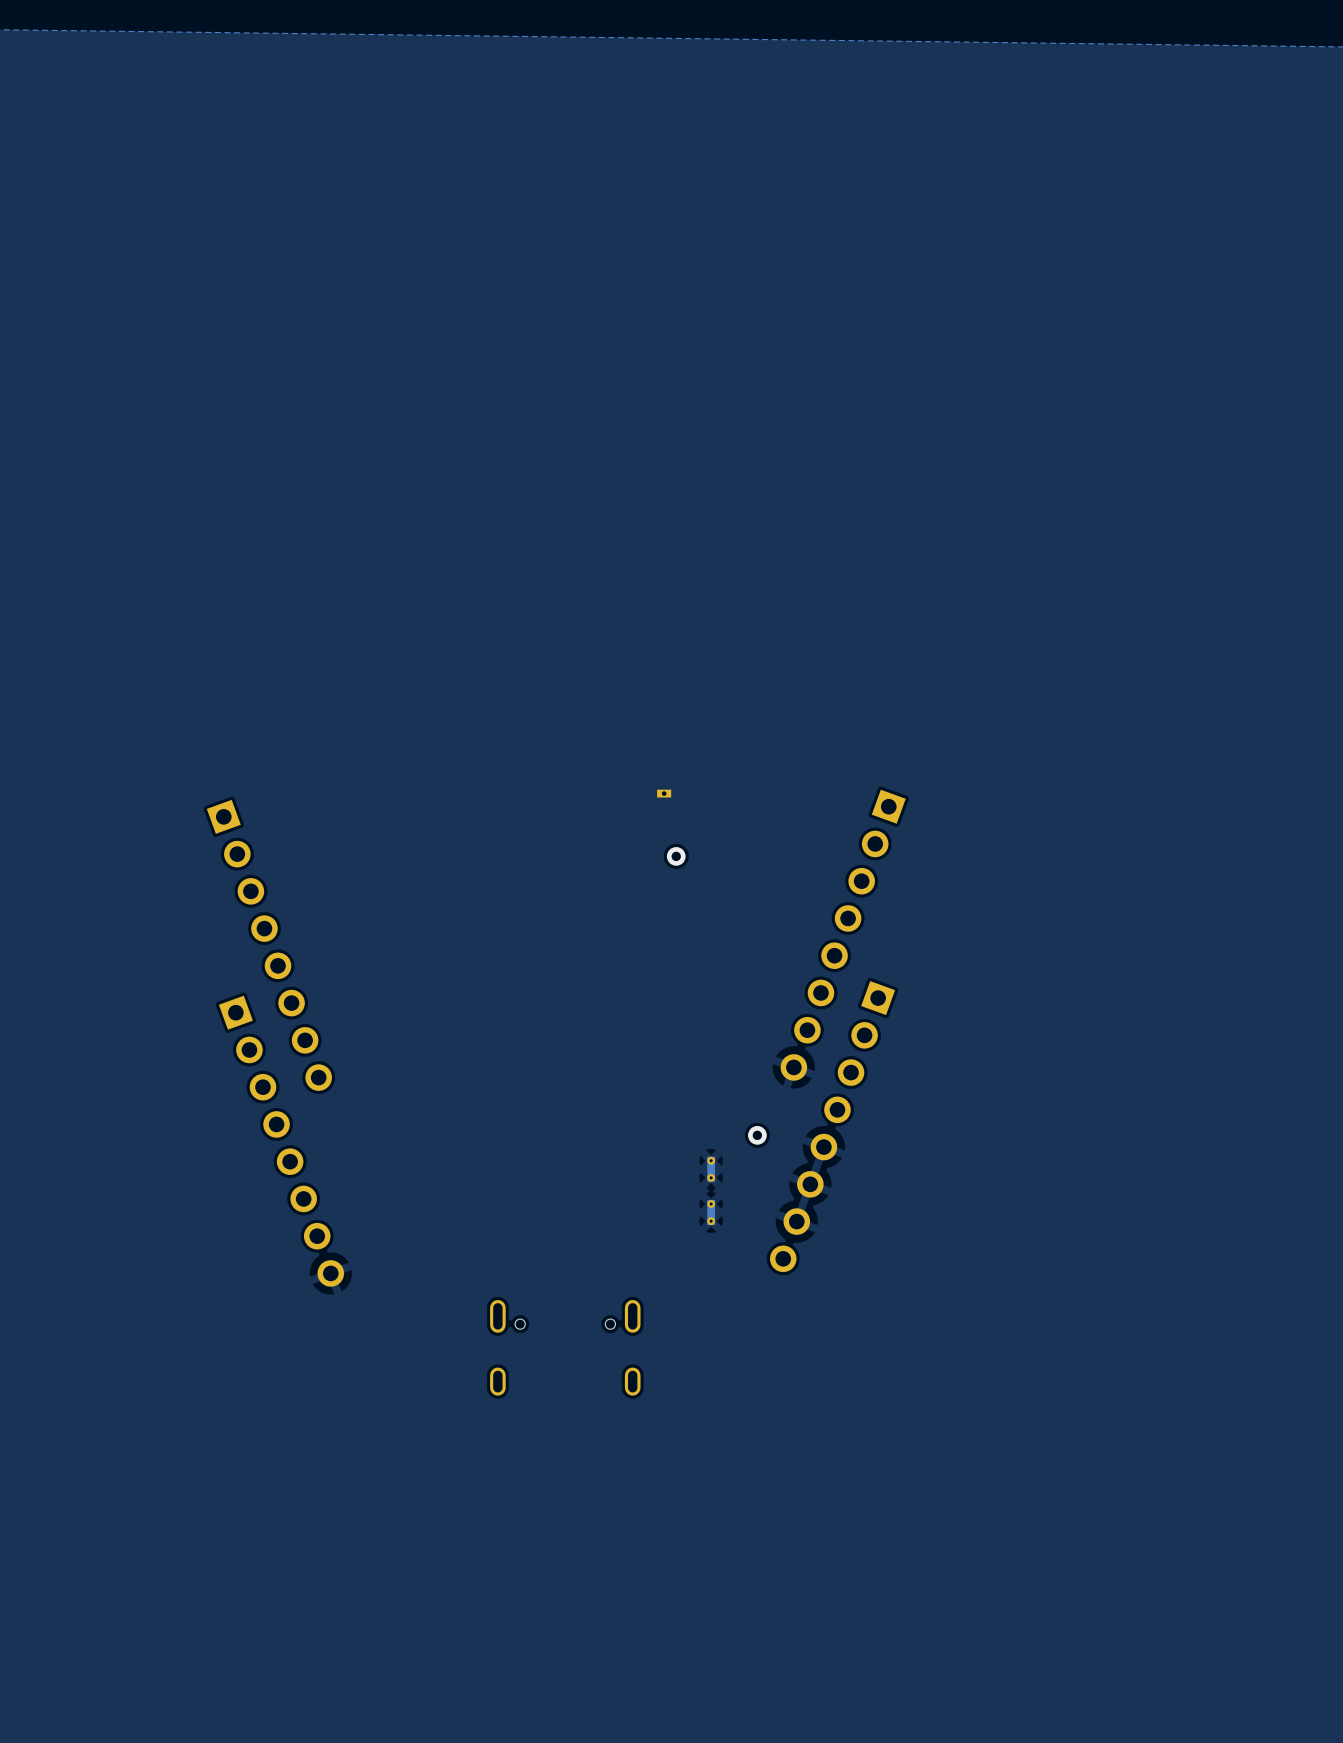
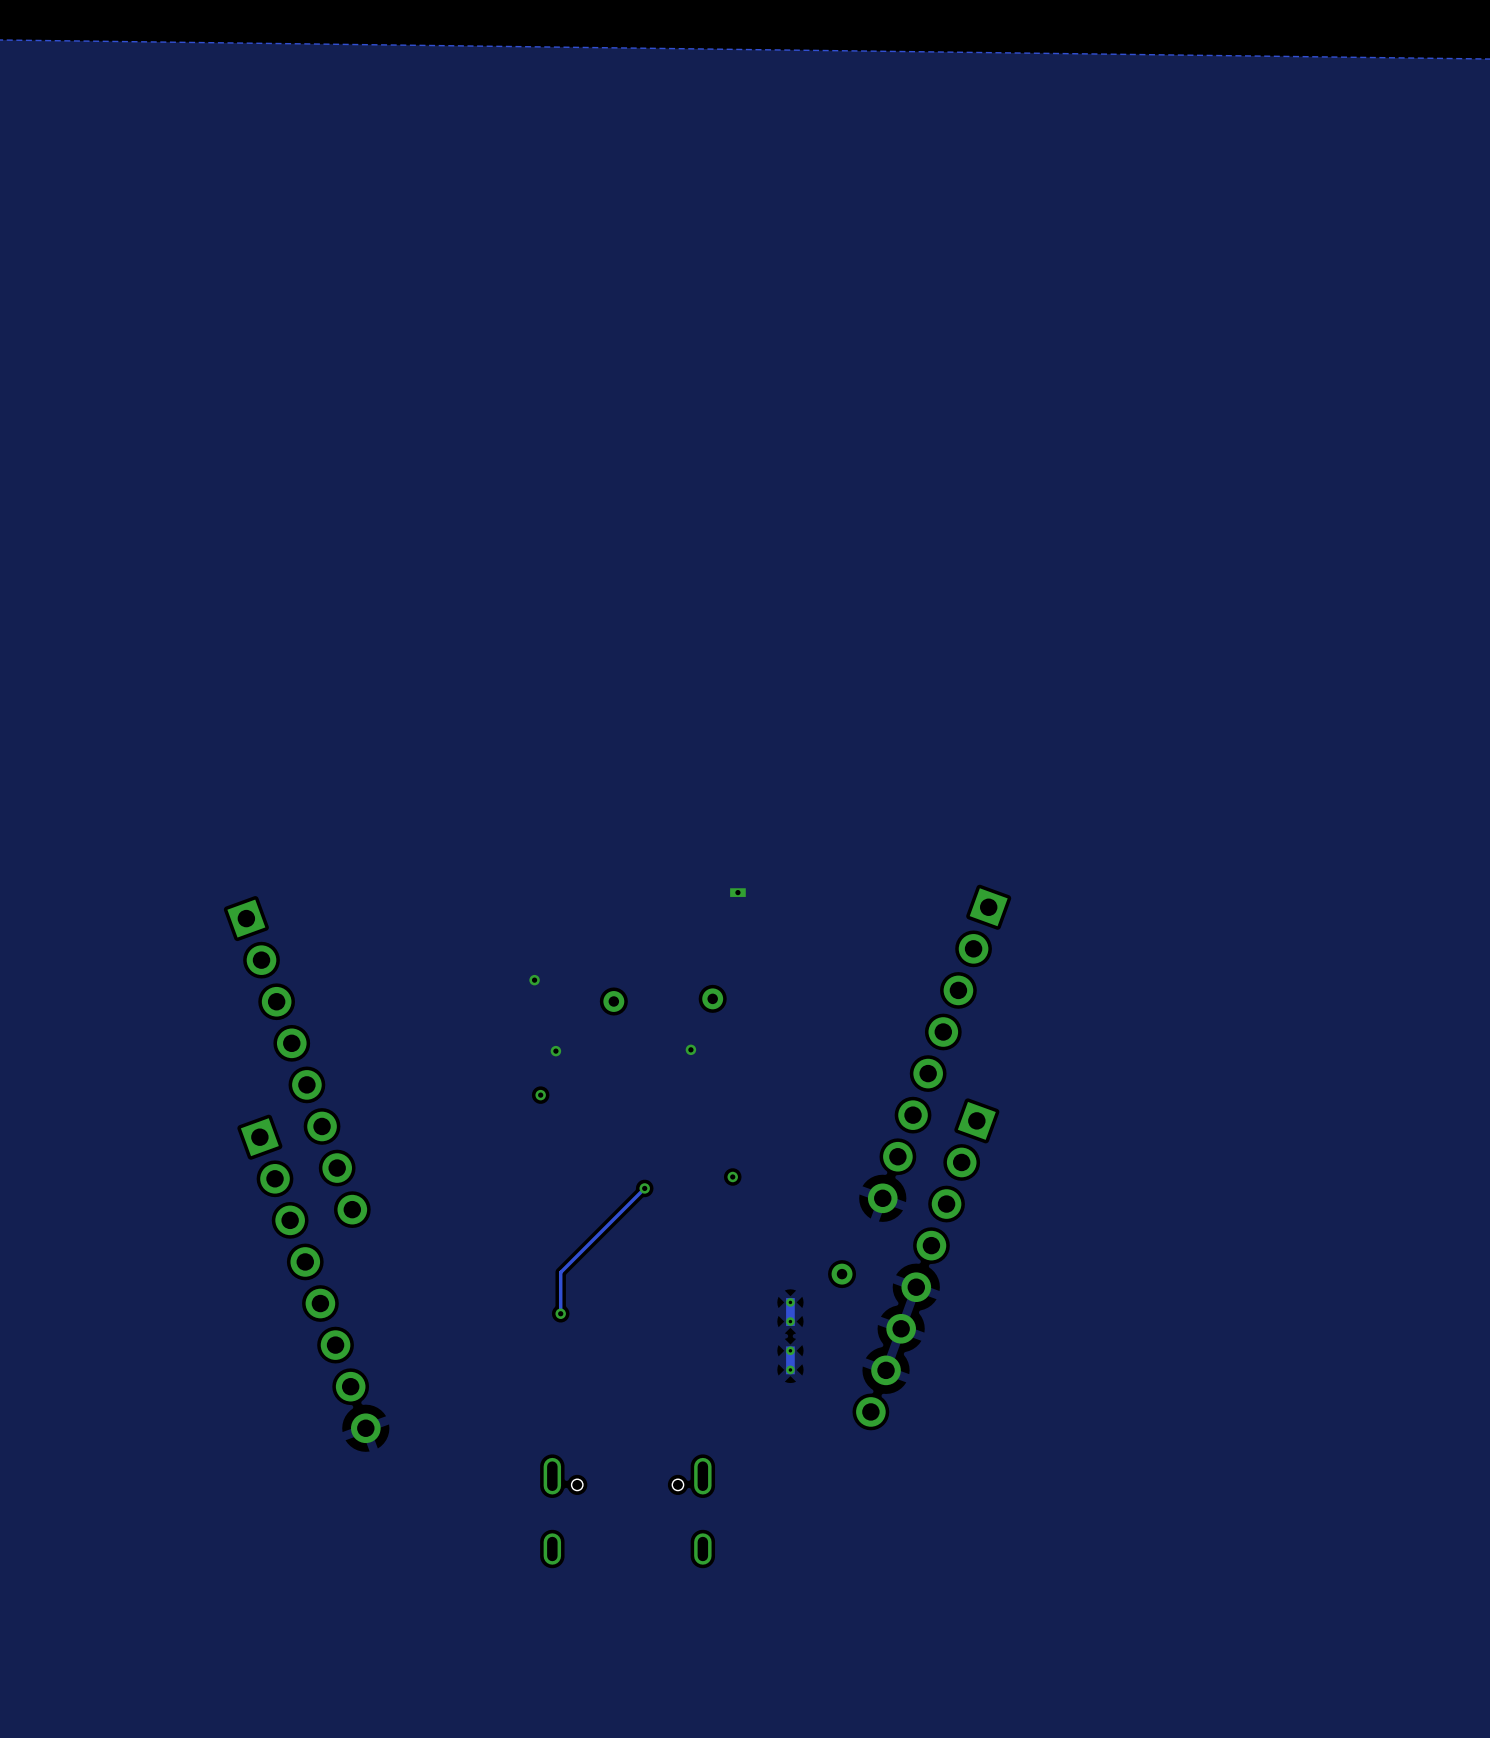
via position: (676, 856) -> (712, 998)
via: none -> (534, 980)
via: none -> (613, 1001)
via: none -> (690, 1049)
via: none -> (555, 1051)
via: none -> (540, 1095)
via: none -> (732, 1176)
track: none -> (644, 1188) (560, 1272) (560, 1313)
via: none -> (644, 1188)
via: none -> (560, 1313)

